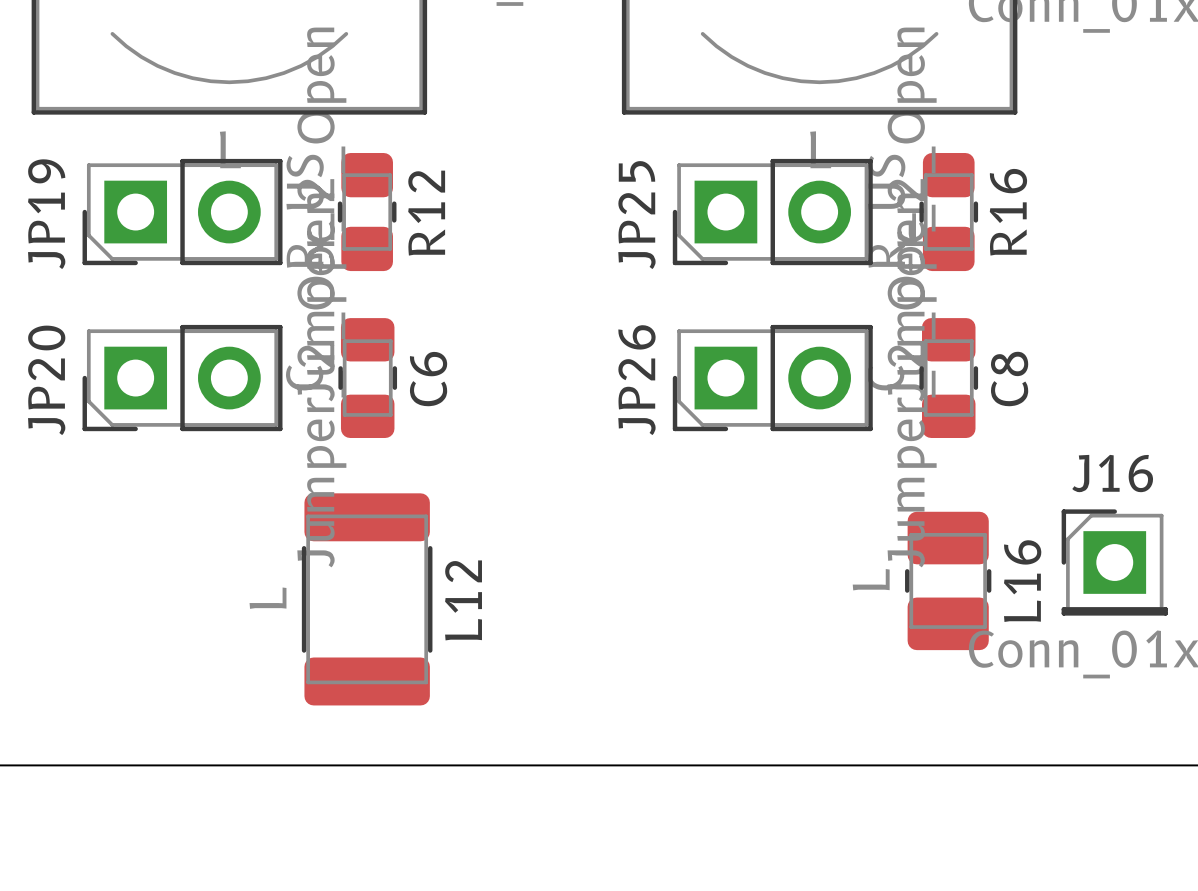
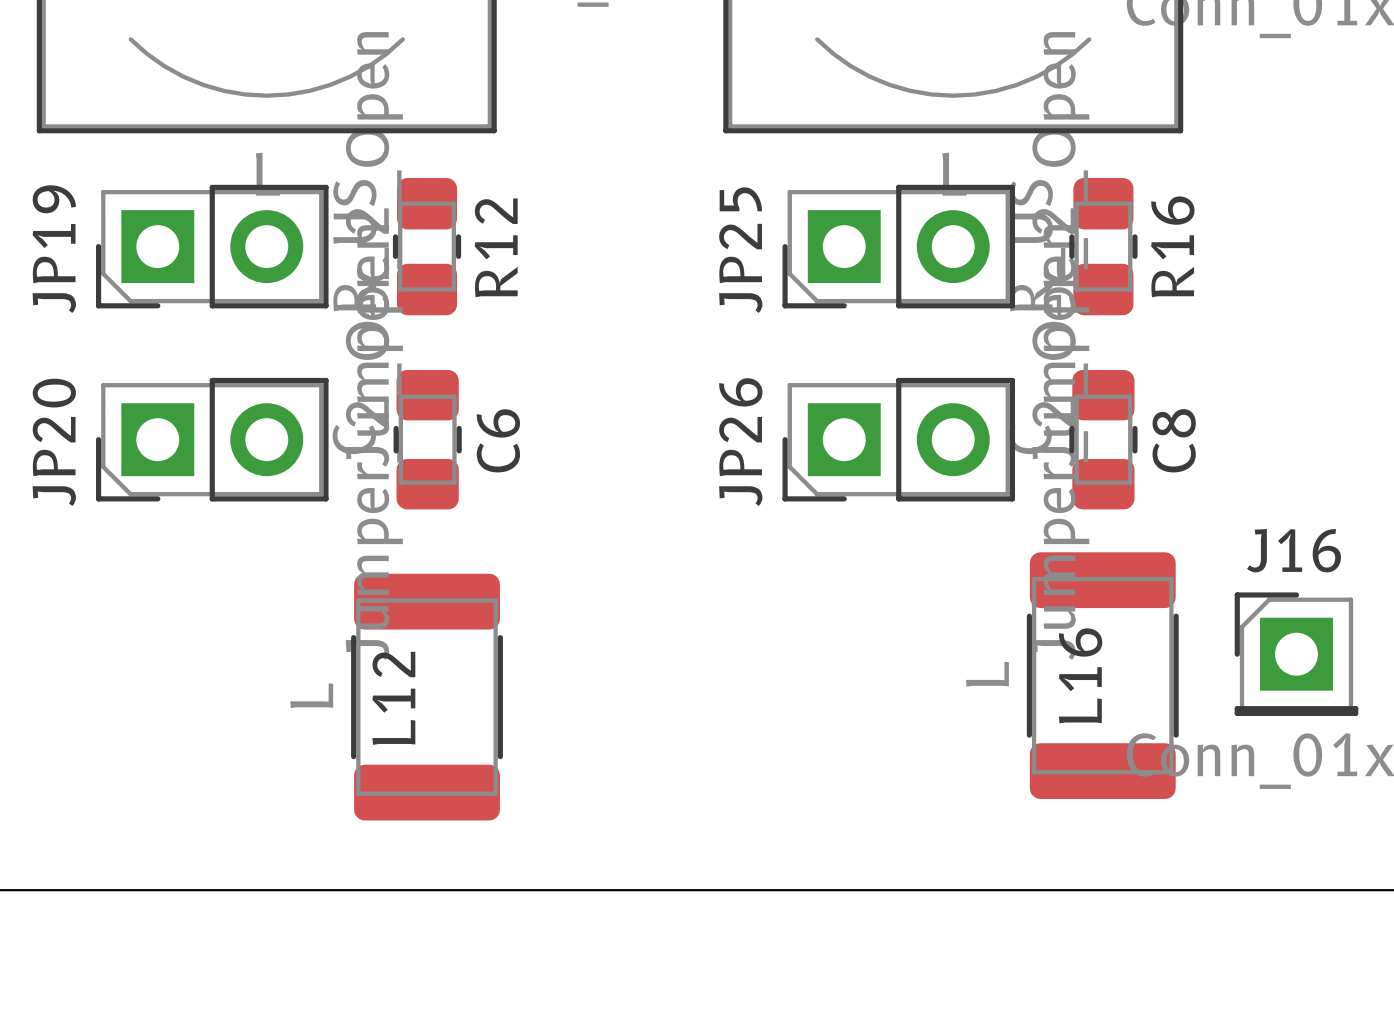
L16 footprint: [905, 511, 992, 651] -> [1026, 552, 1179, 800]
L16 name position: L16 (1022, 581) -> L16 (1080, 675)
L12 name position: L12 (463, 600) -> L12 (393, 698)

